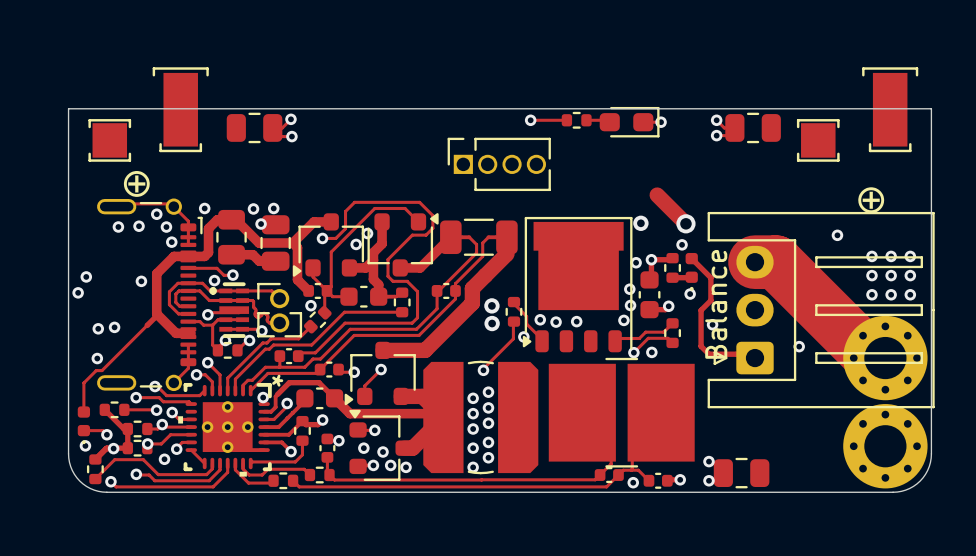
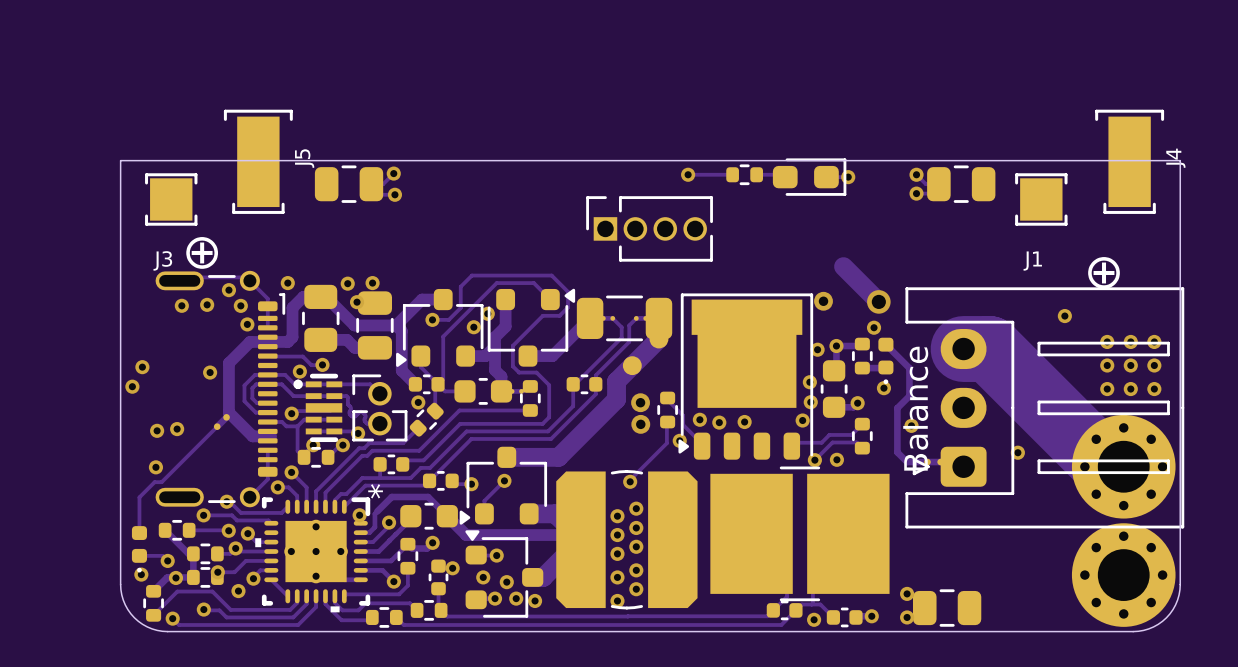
J4 name: none -> J4 (1175, 158)
J5 name: none -> J5 (304, 158)
J3 name: none -> J3 (162, 260)
J1 name: none -> J1 (1032, 261)

